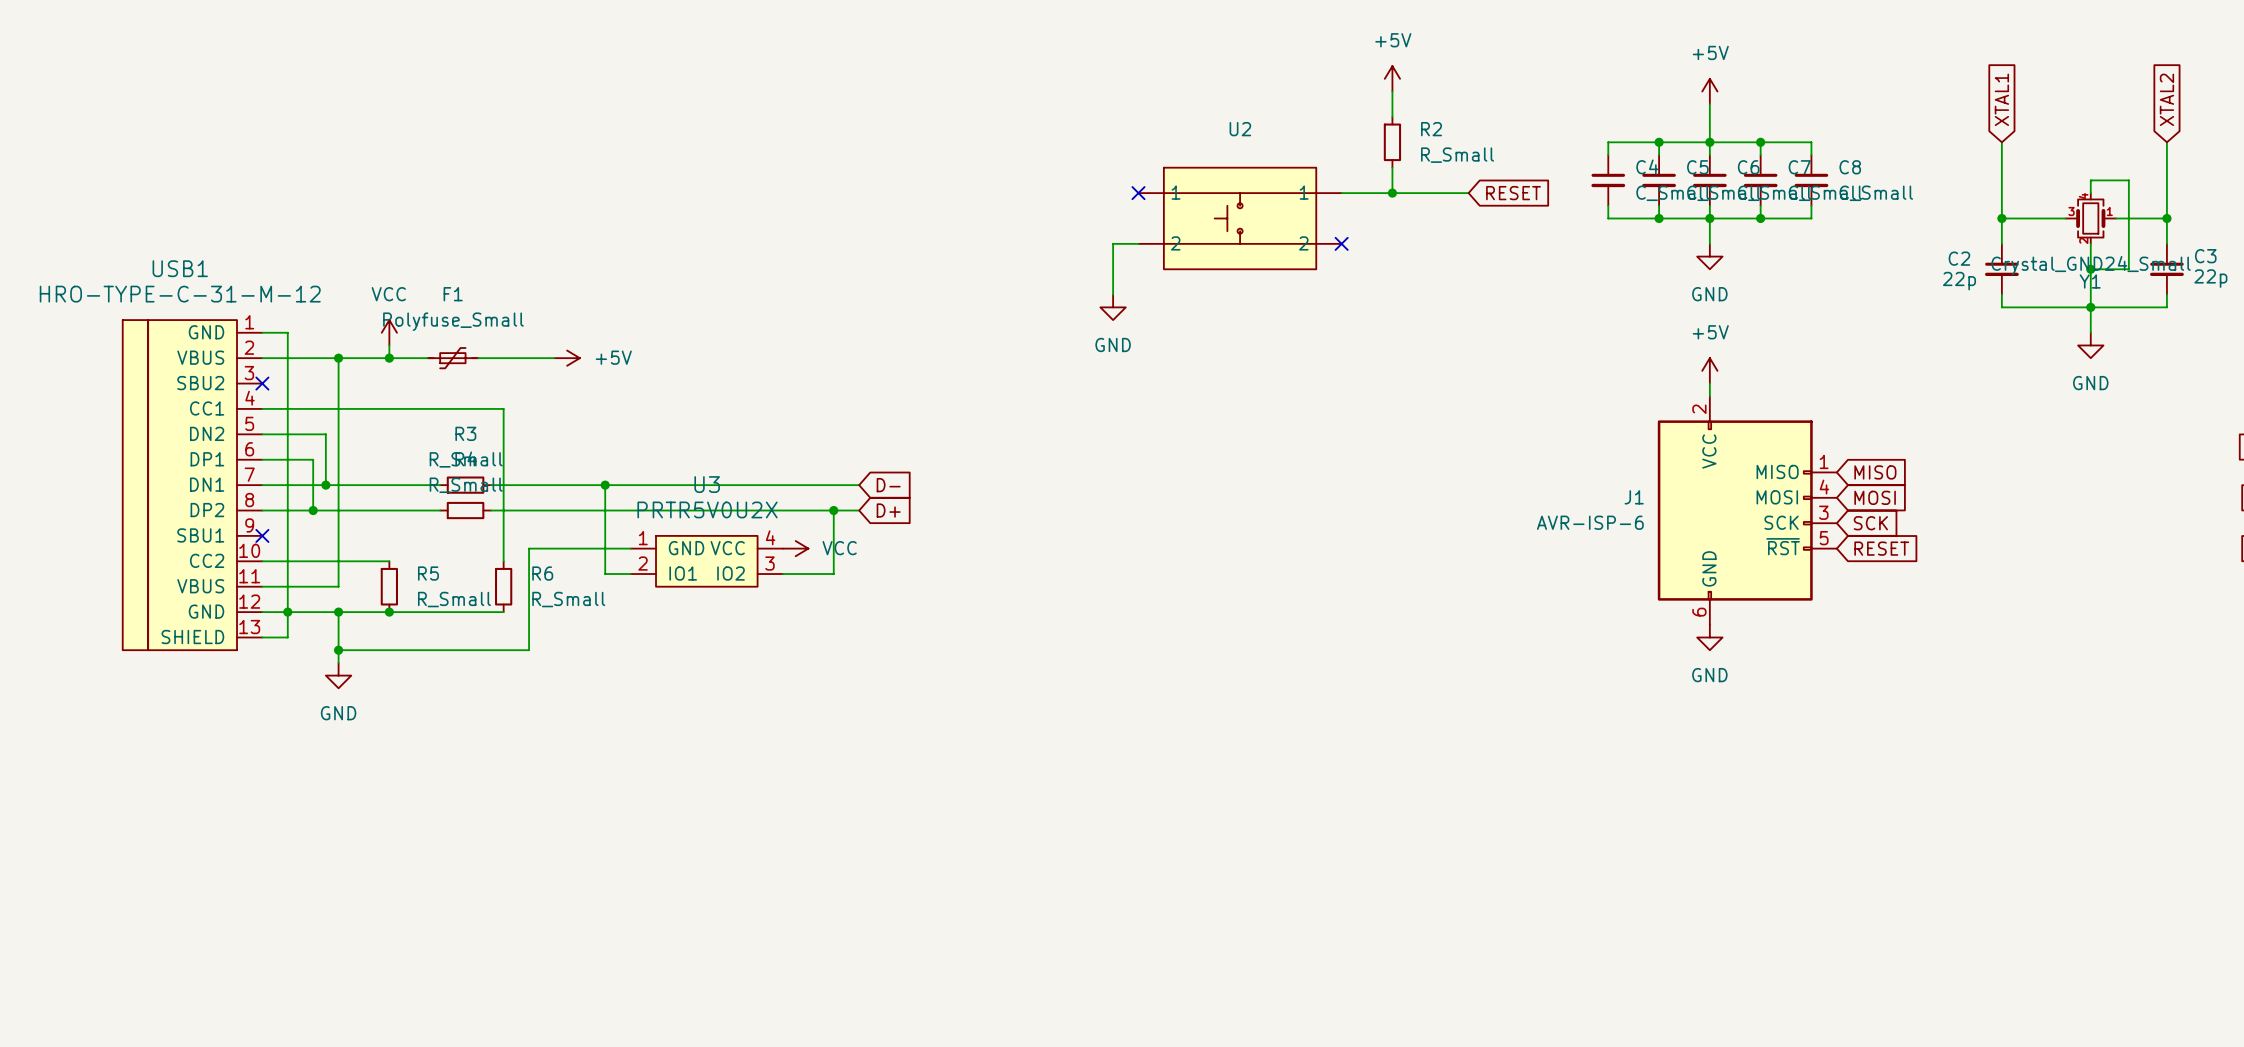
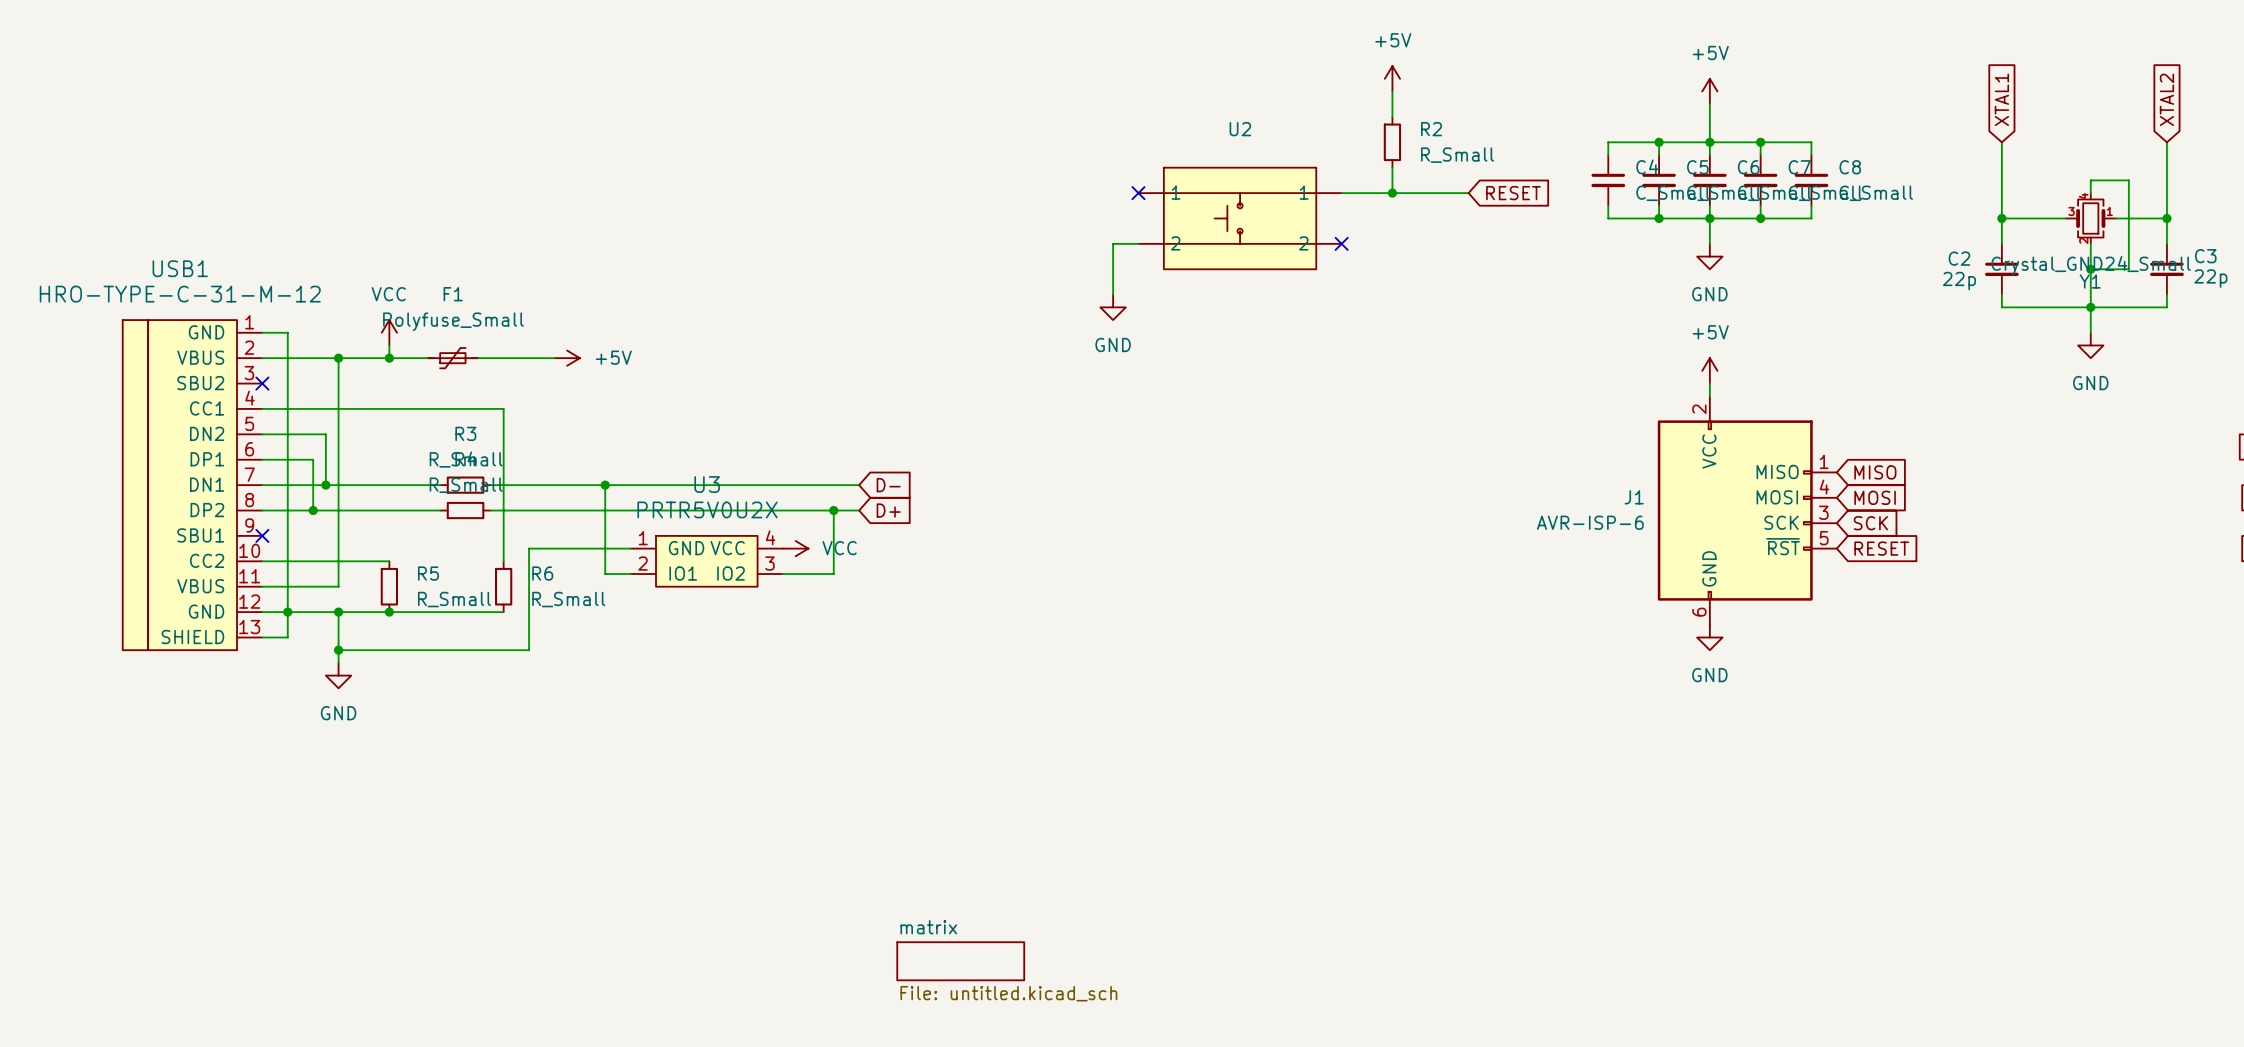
sheet matrix: none -> File: untitled.kicad_sch (960, 961)

